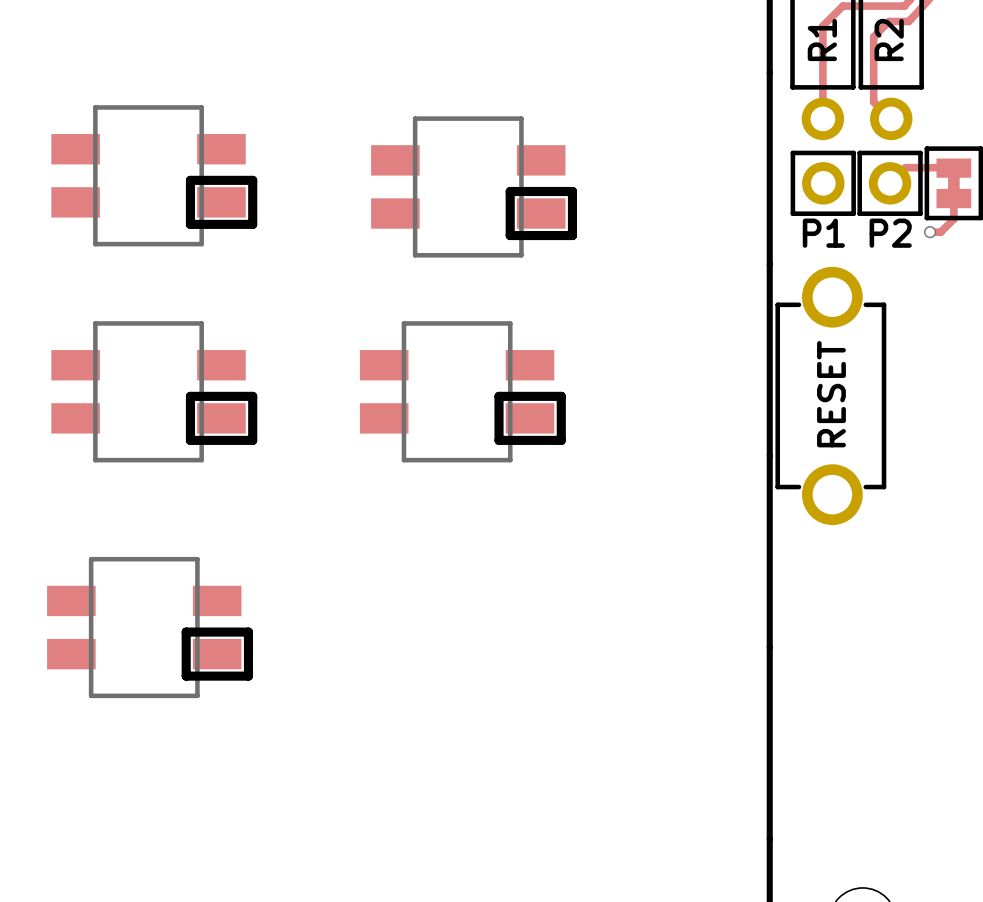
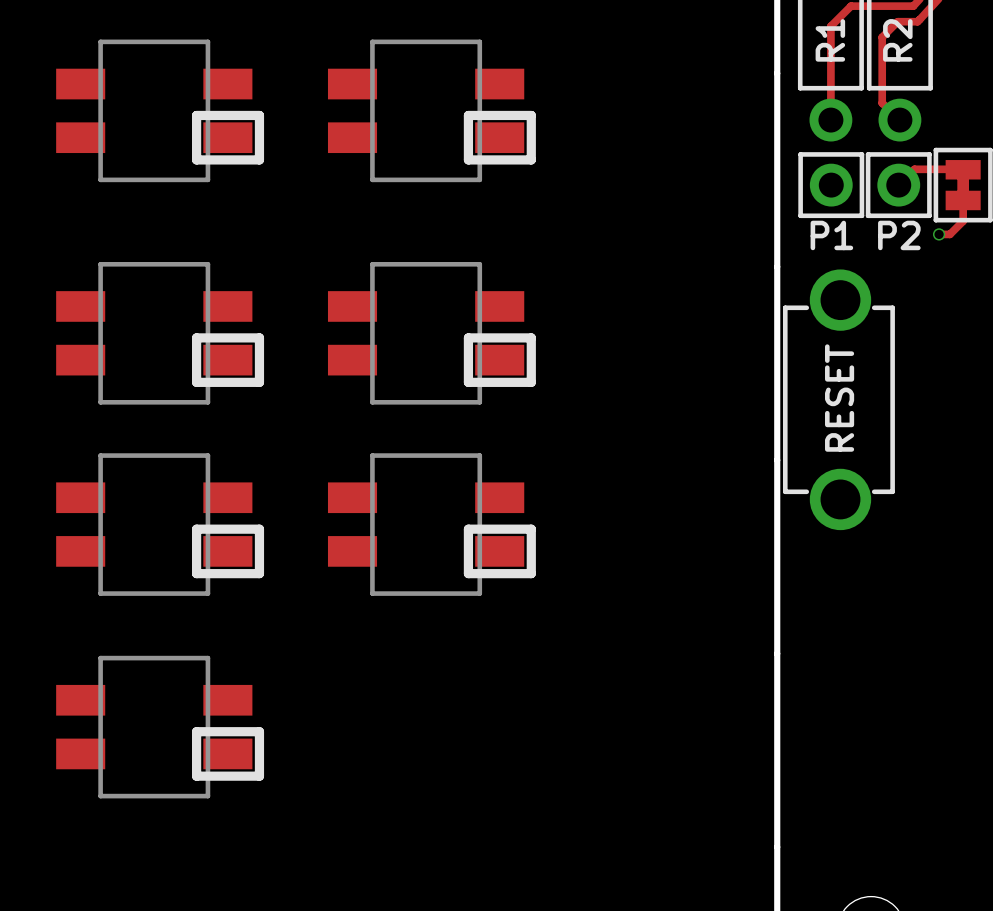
part: none -> (431, 110)
part position: (154, 175) -> (160, 110)
part: (474, 186) -> none
part: none -> (431, 333)
part position: (154, 391) -> (160, 333)
part: (462, 391) -> none
part: none -> (160, 524)
part: none -> (431, 524)
part: (150, 627) -> none
part: none -> (160, 727)

